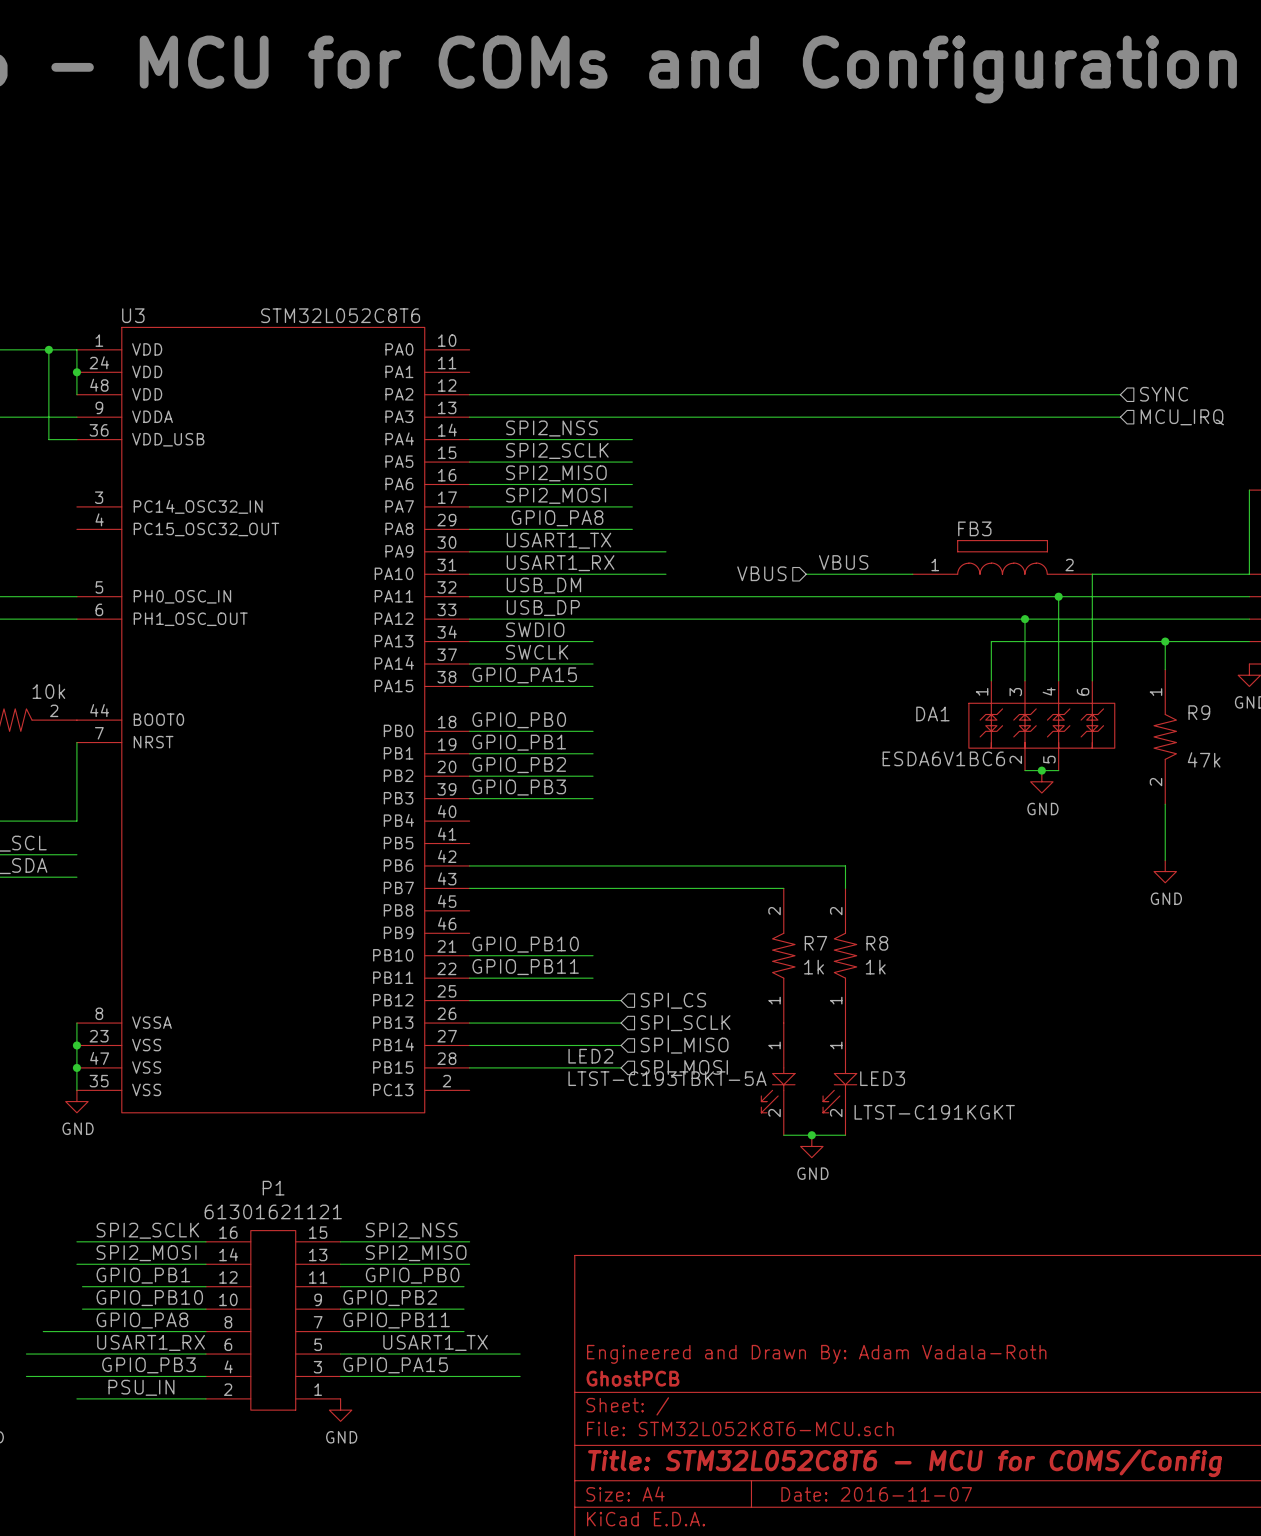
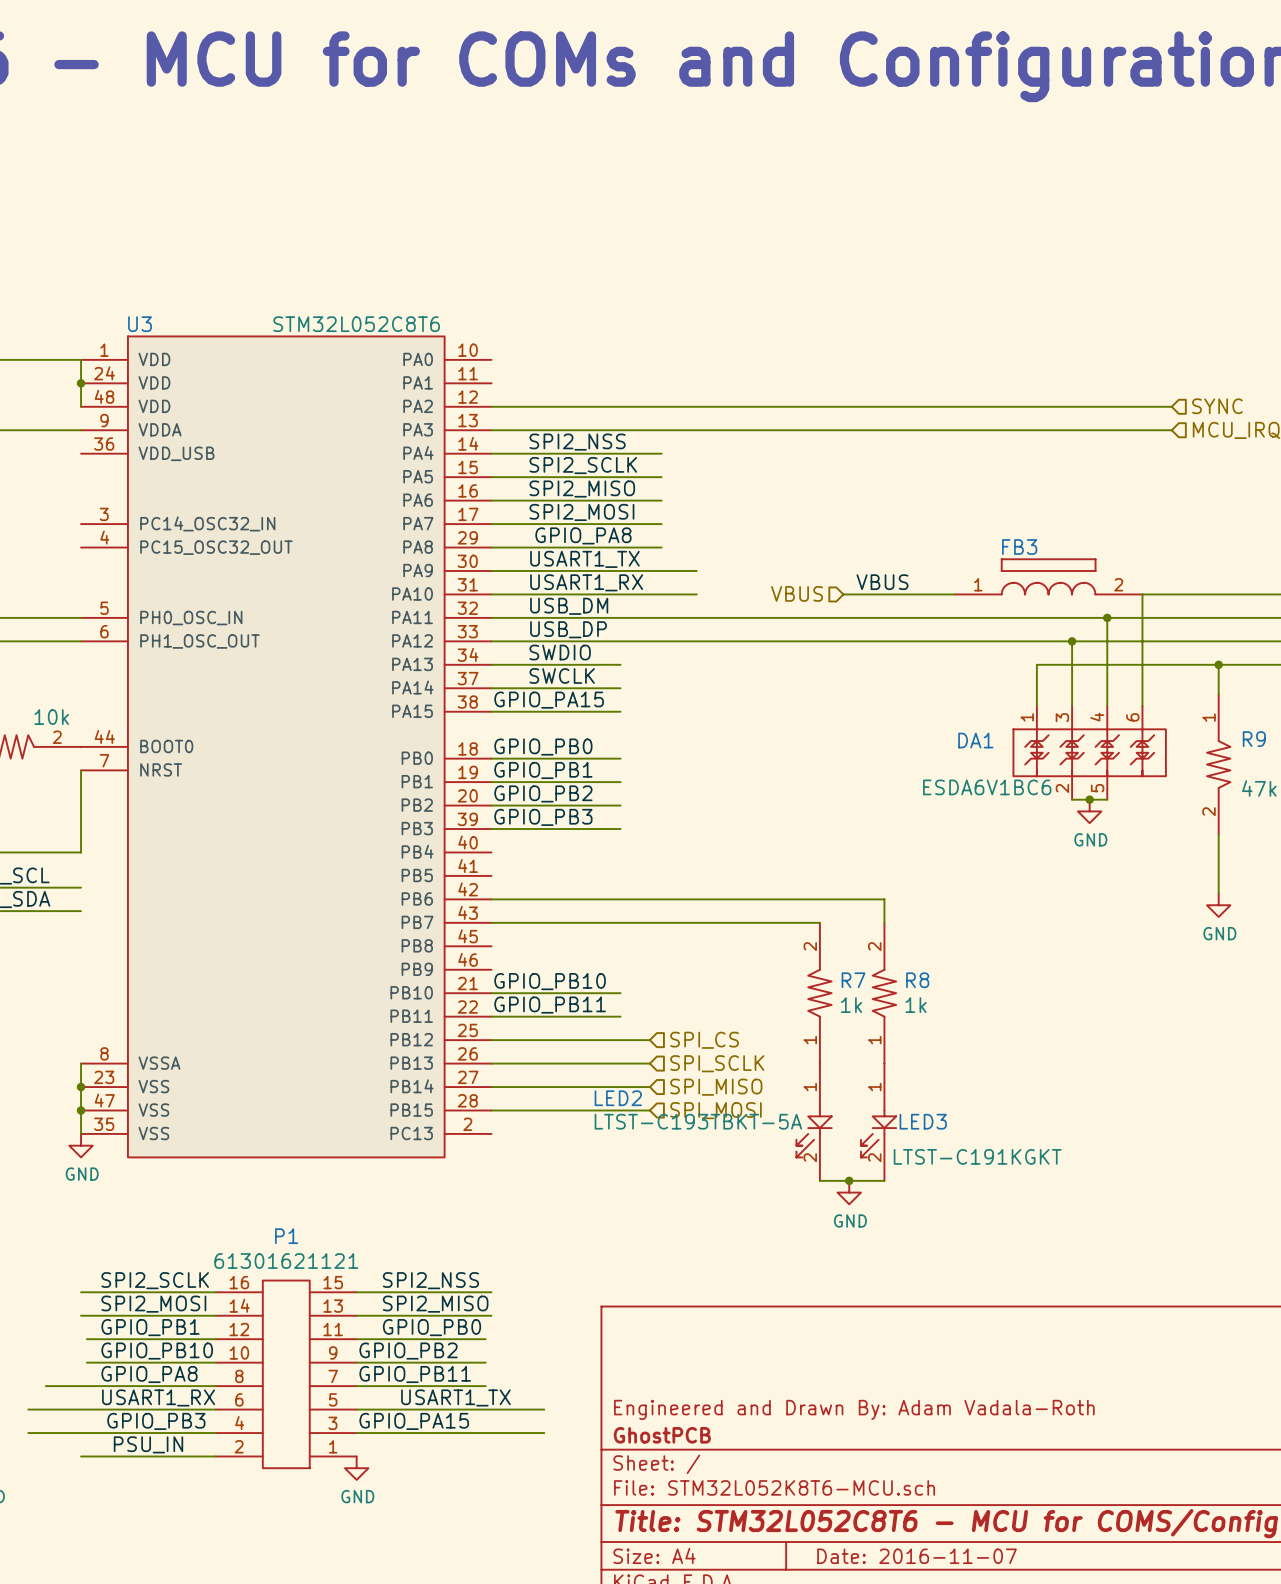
wire: (48, 349) (48, 439) (76, 439) -> none
junction: (48, 349) -> none

